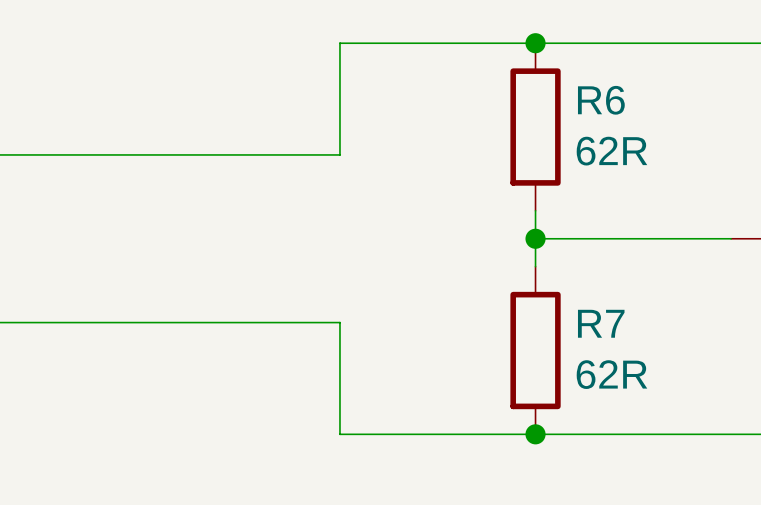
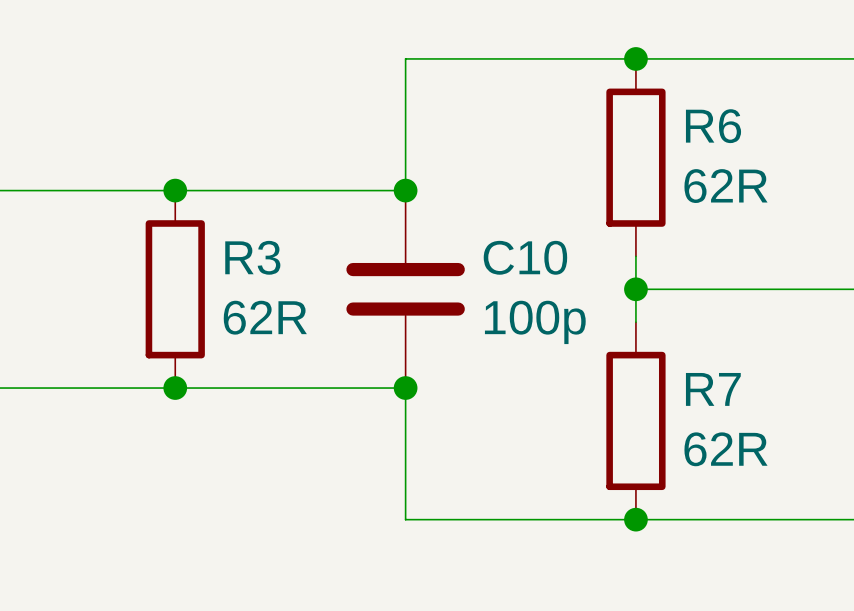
junction: none -> (175, 190)
junction: none -> (405, 190)
R3: none -> 62R (175, 289)
C10: none -> 100p (405, 289)
junction: none -> (175, 388)
junction: none -> (405, 388)

